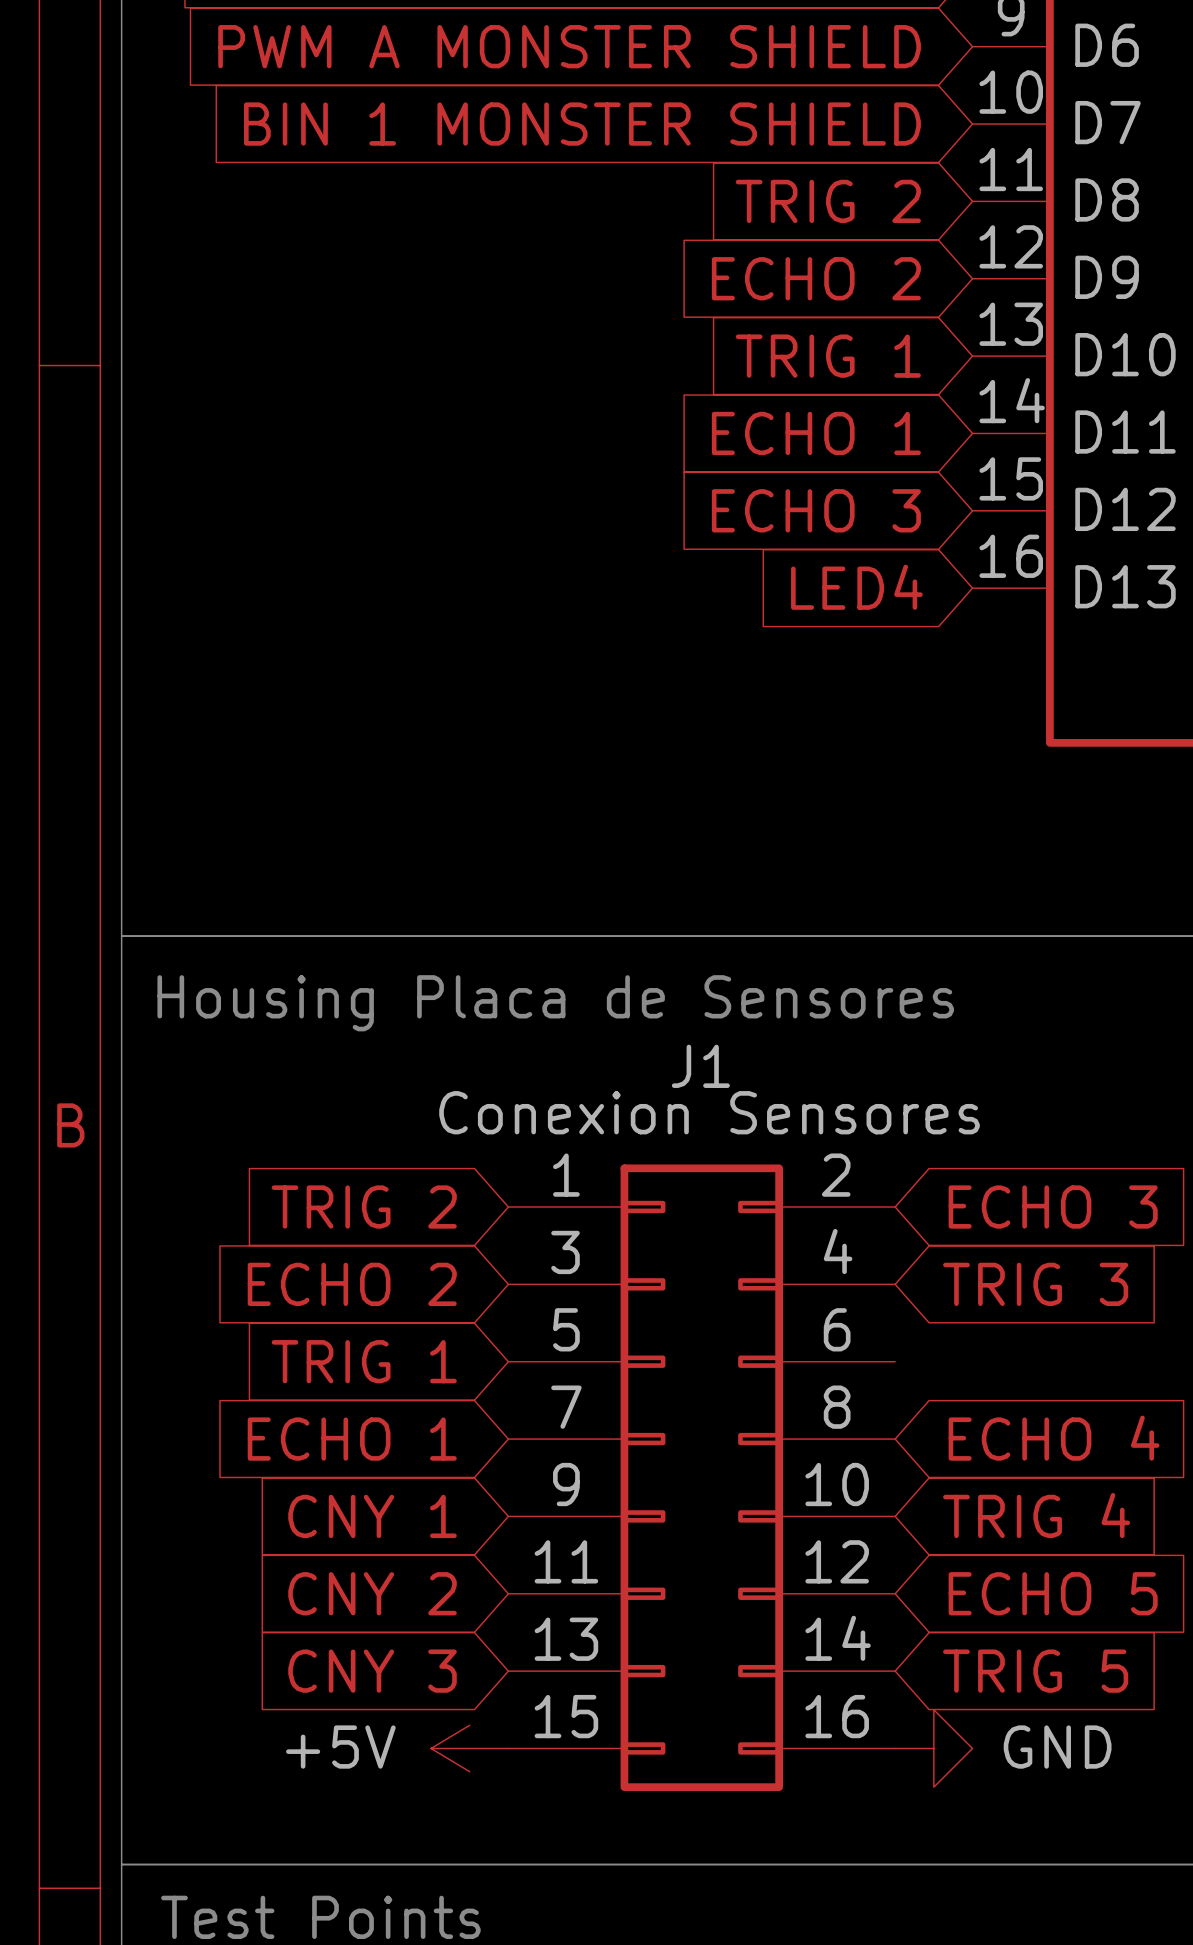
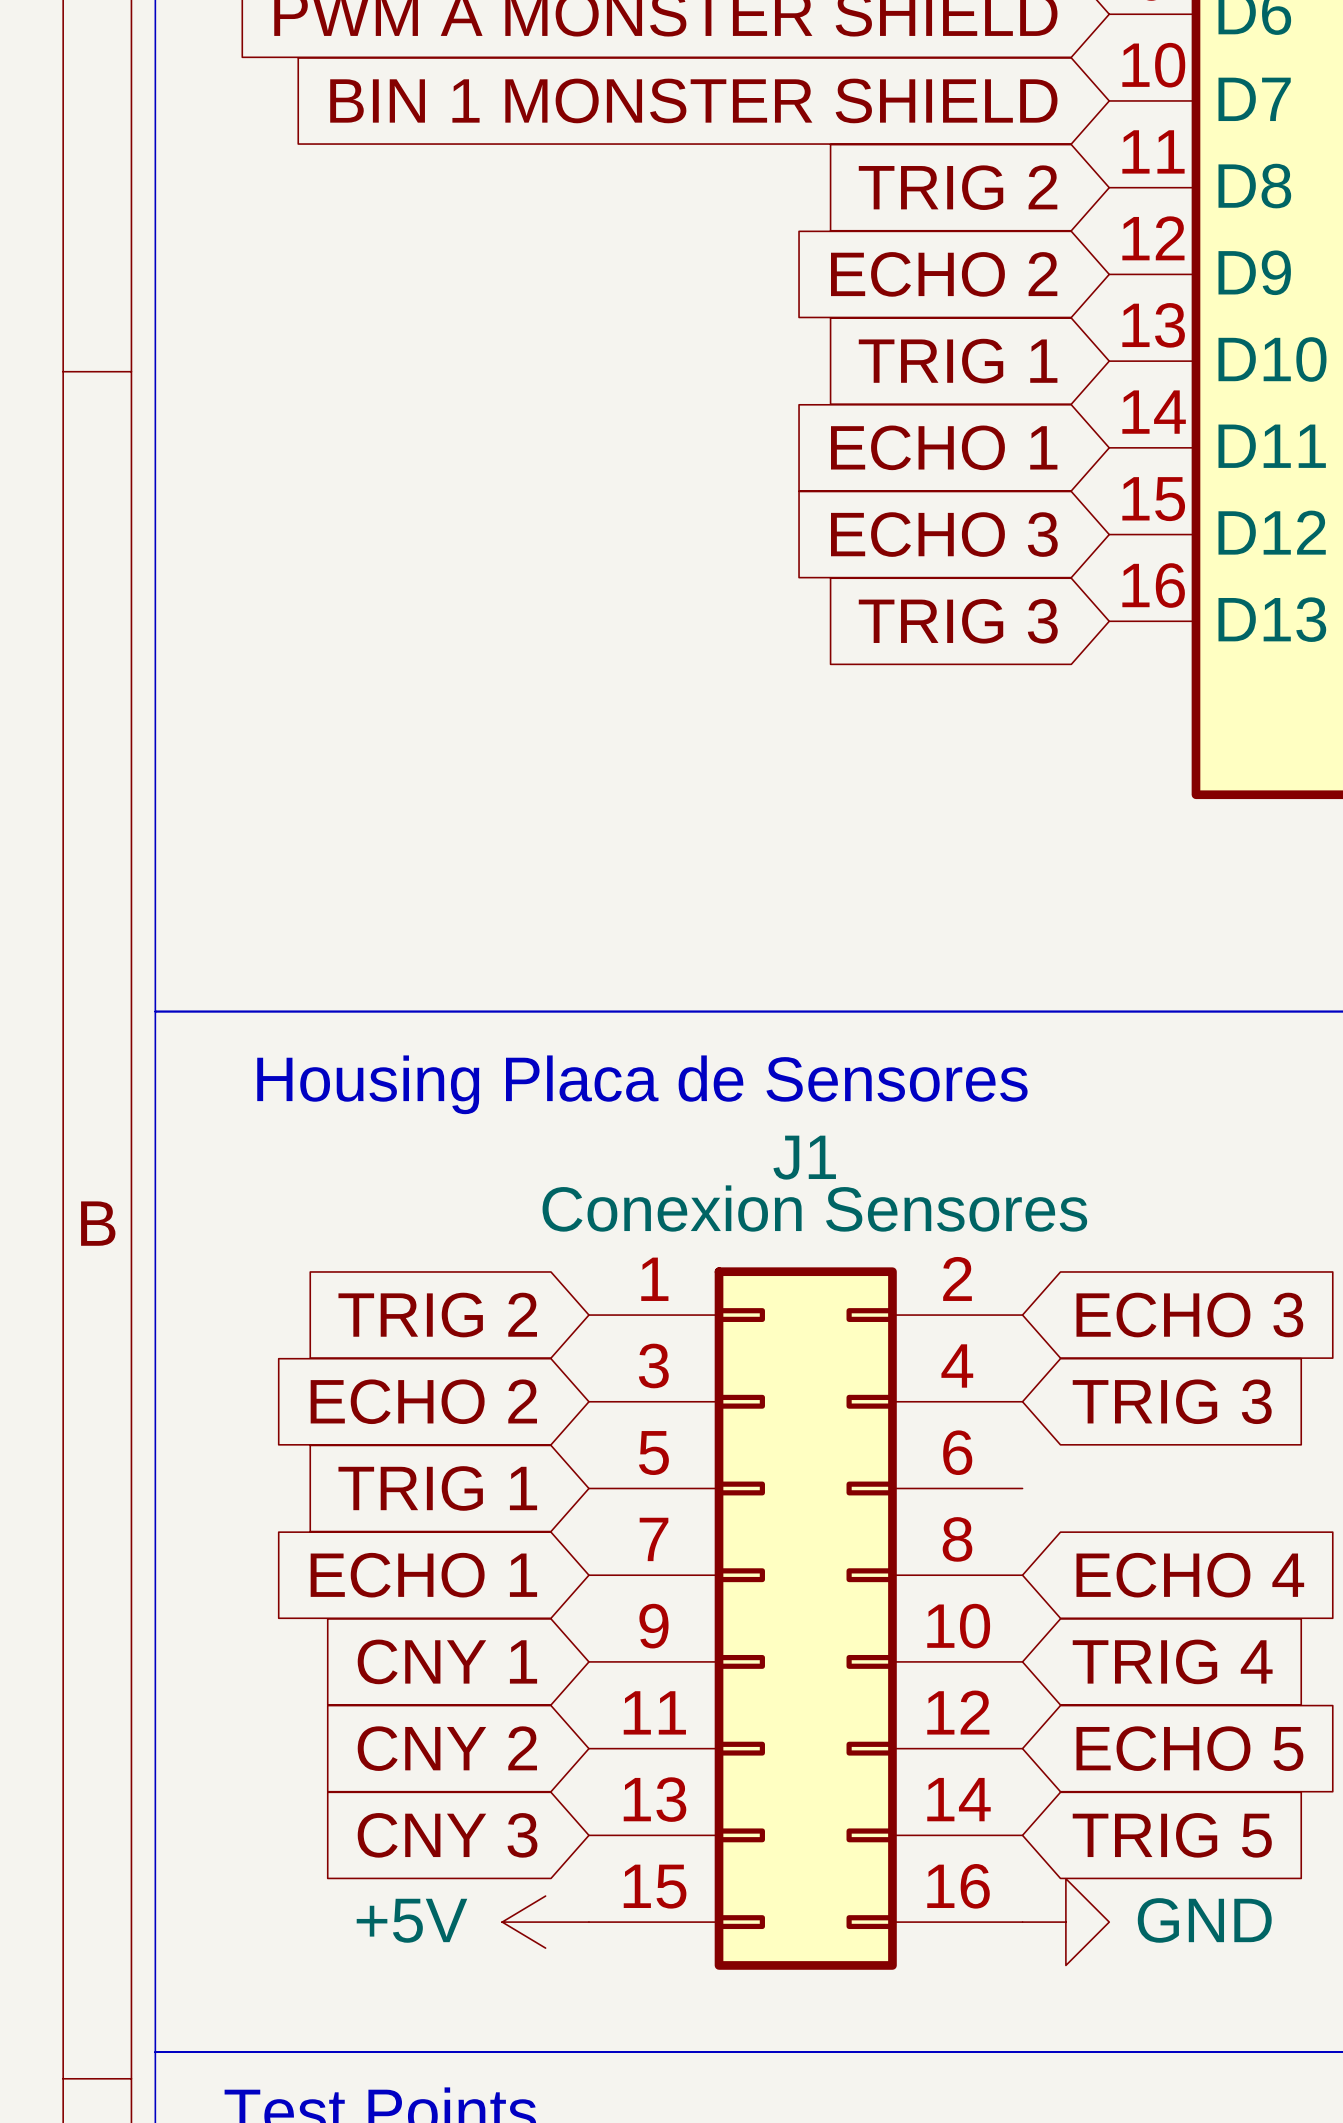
global label: LED4 (856, 587) -> TRIG 3 (958, 621)

